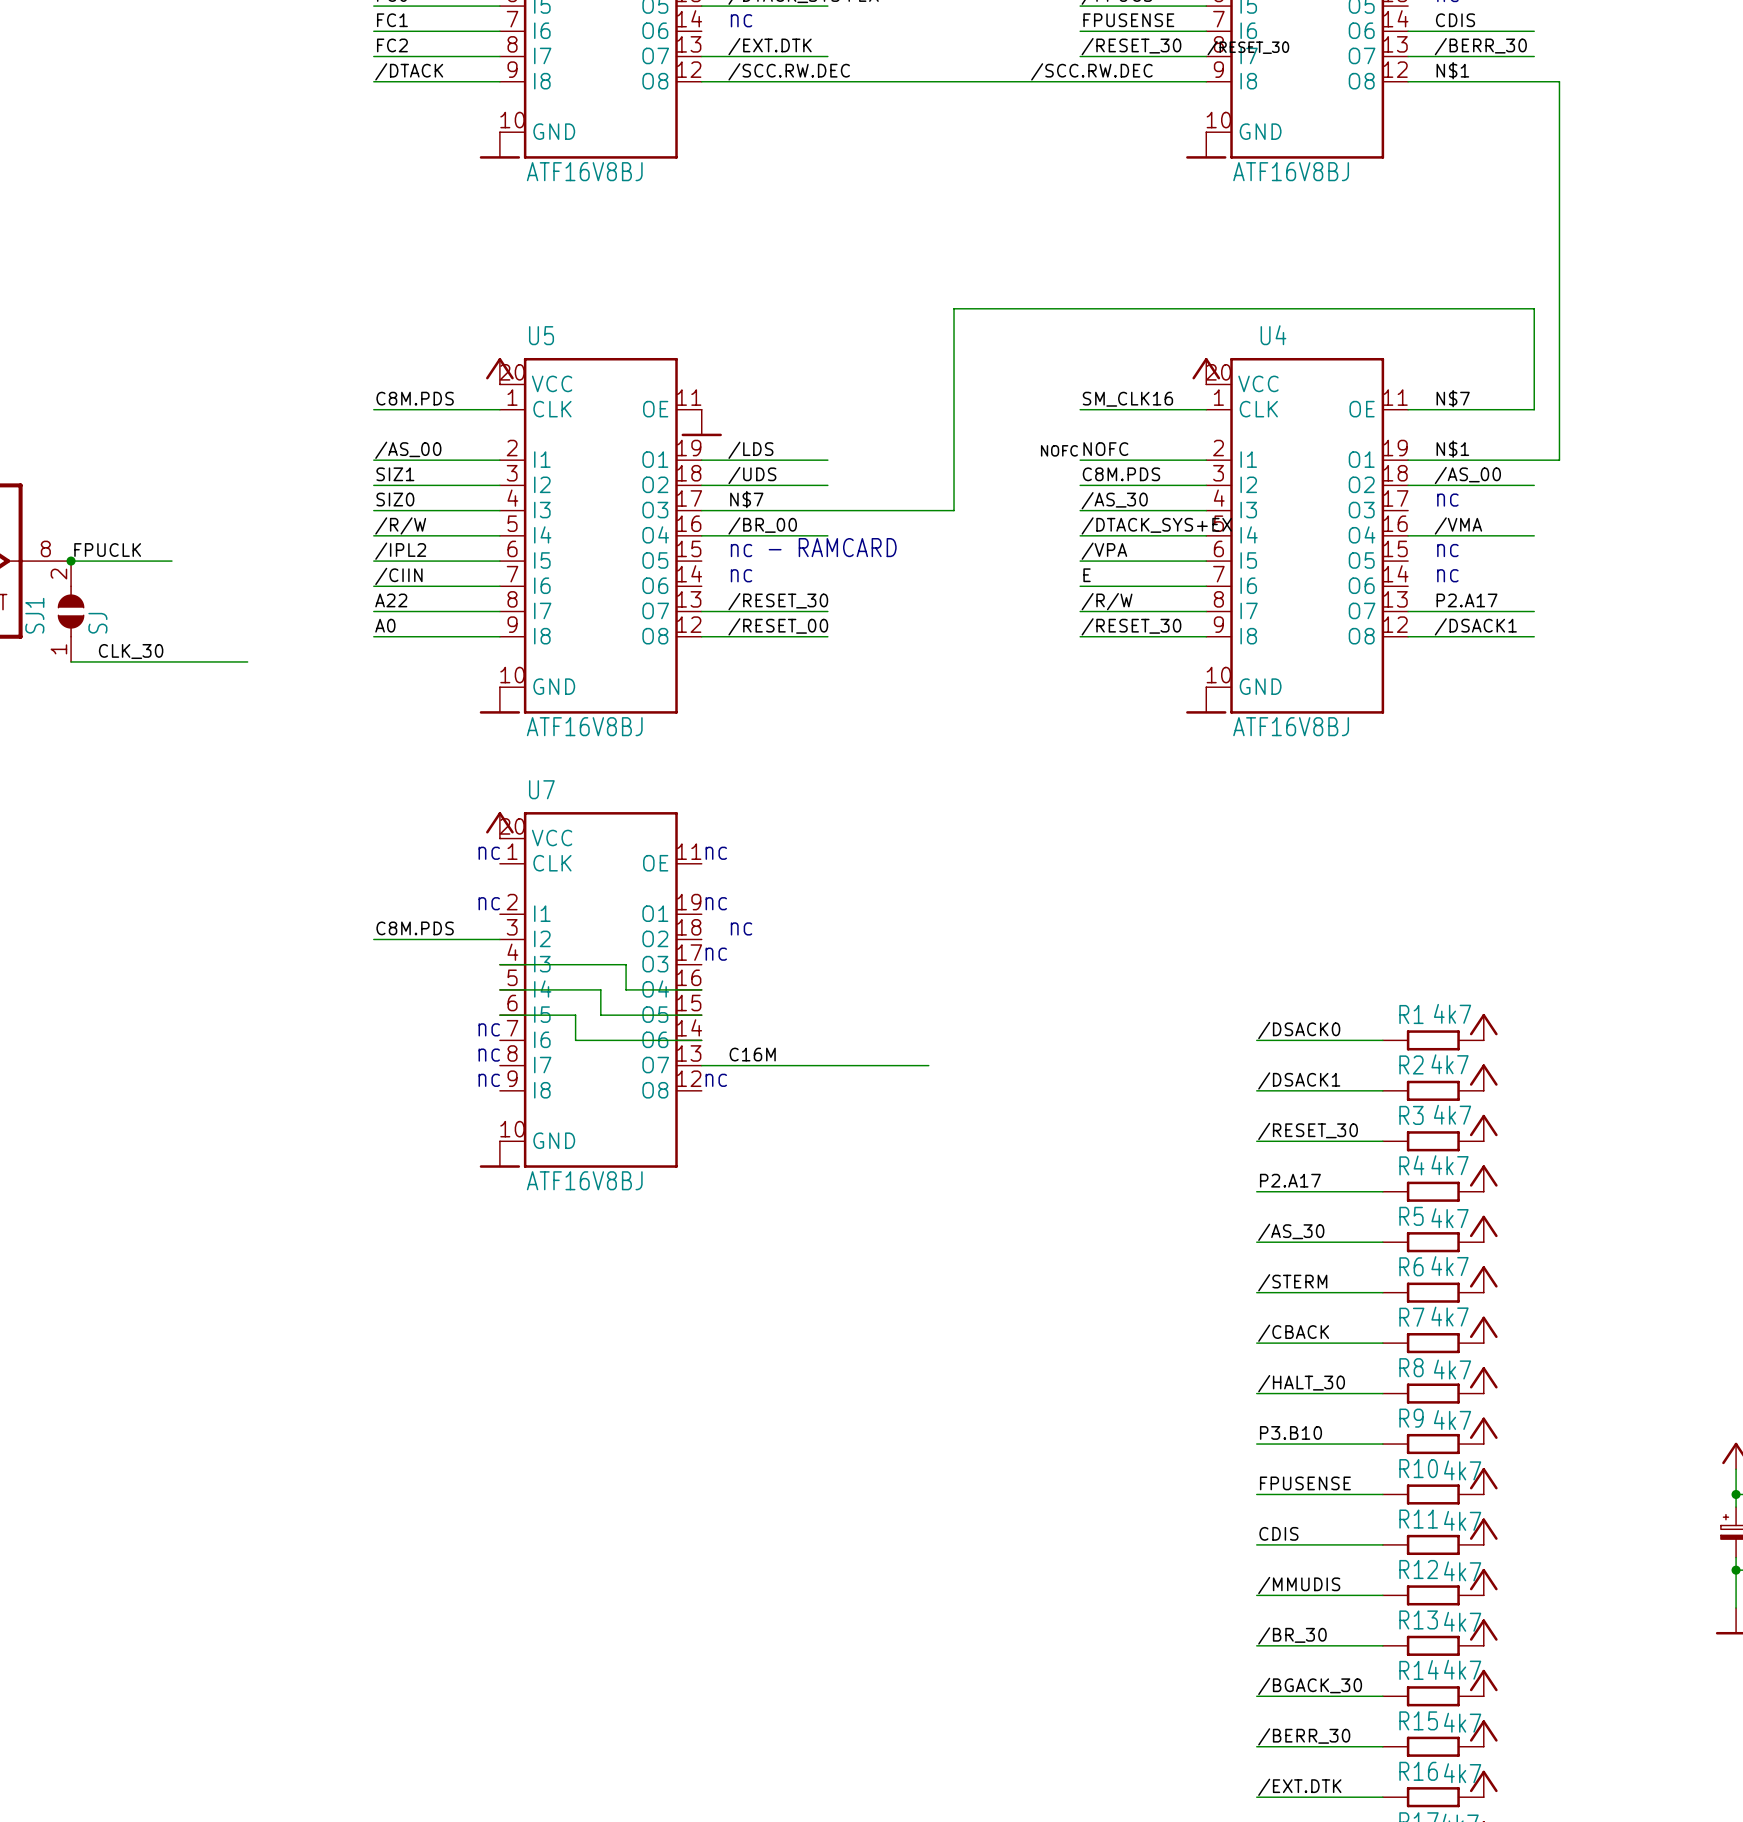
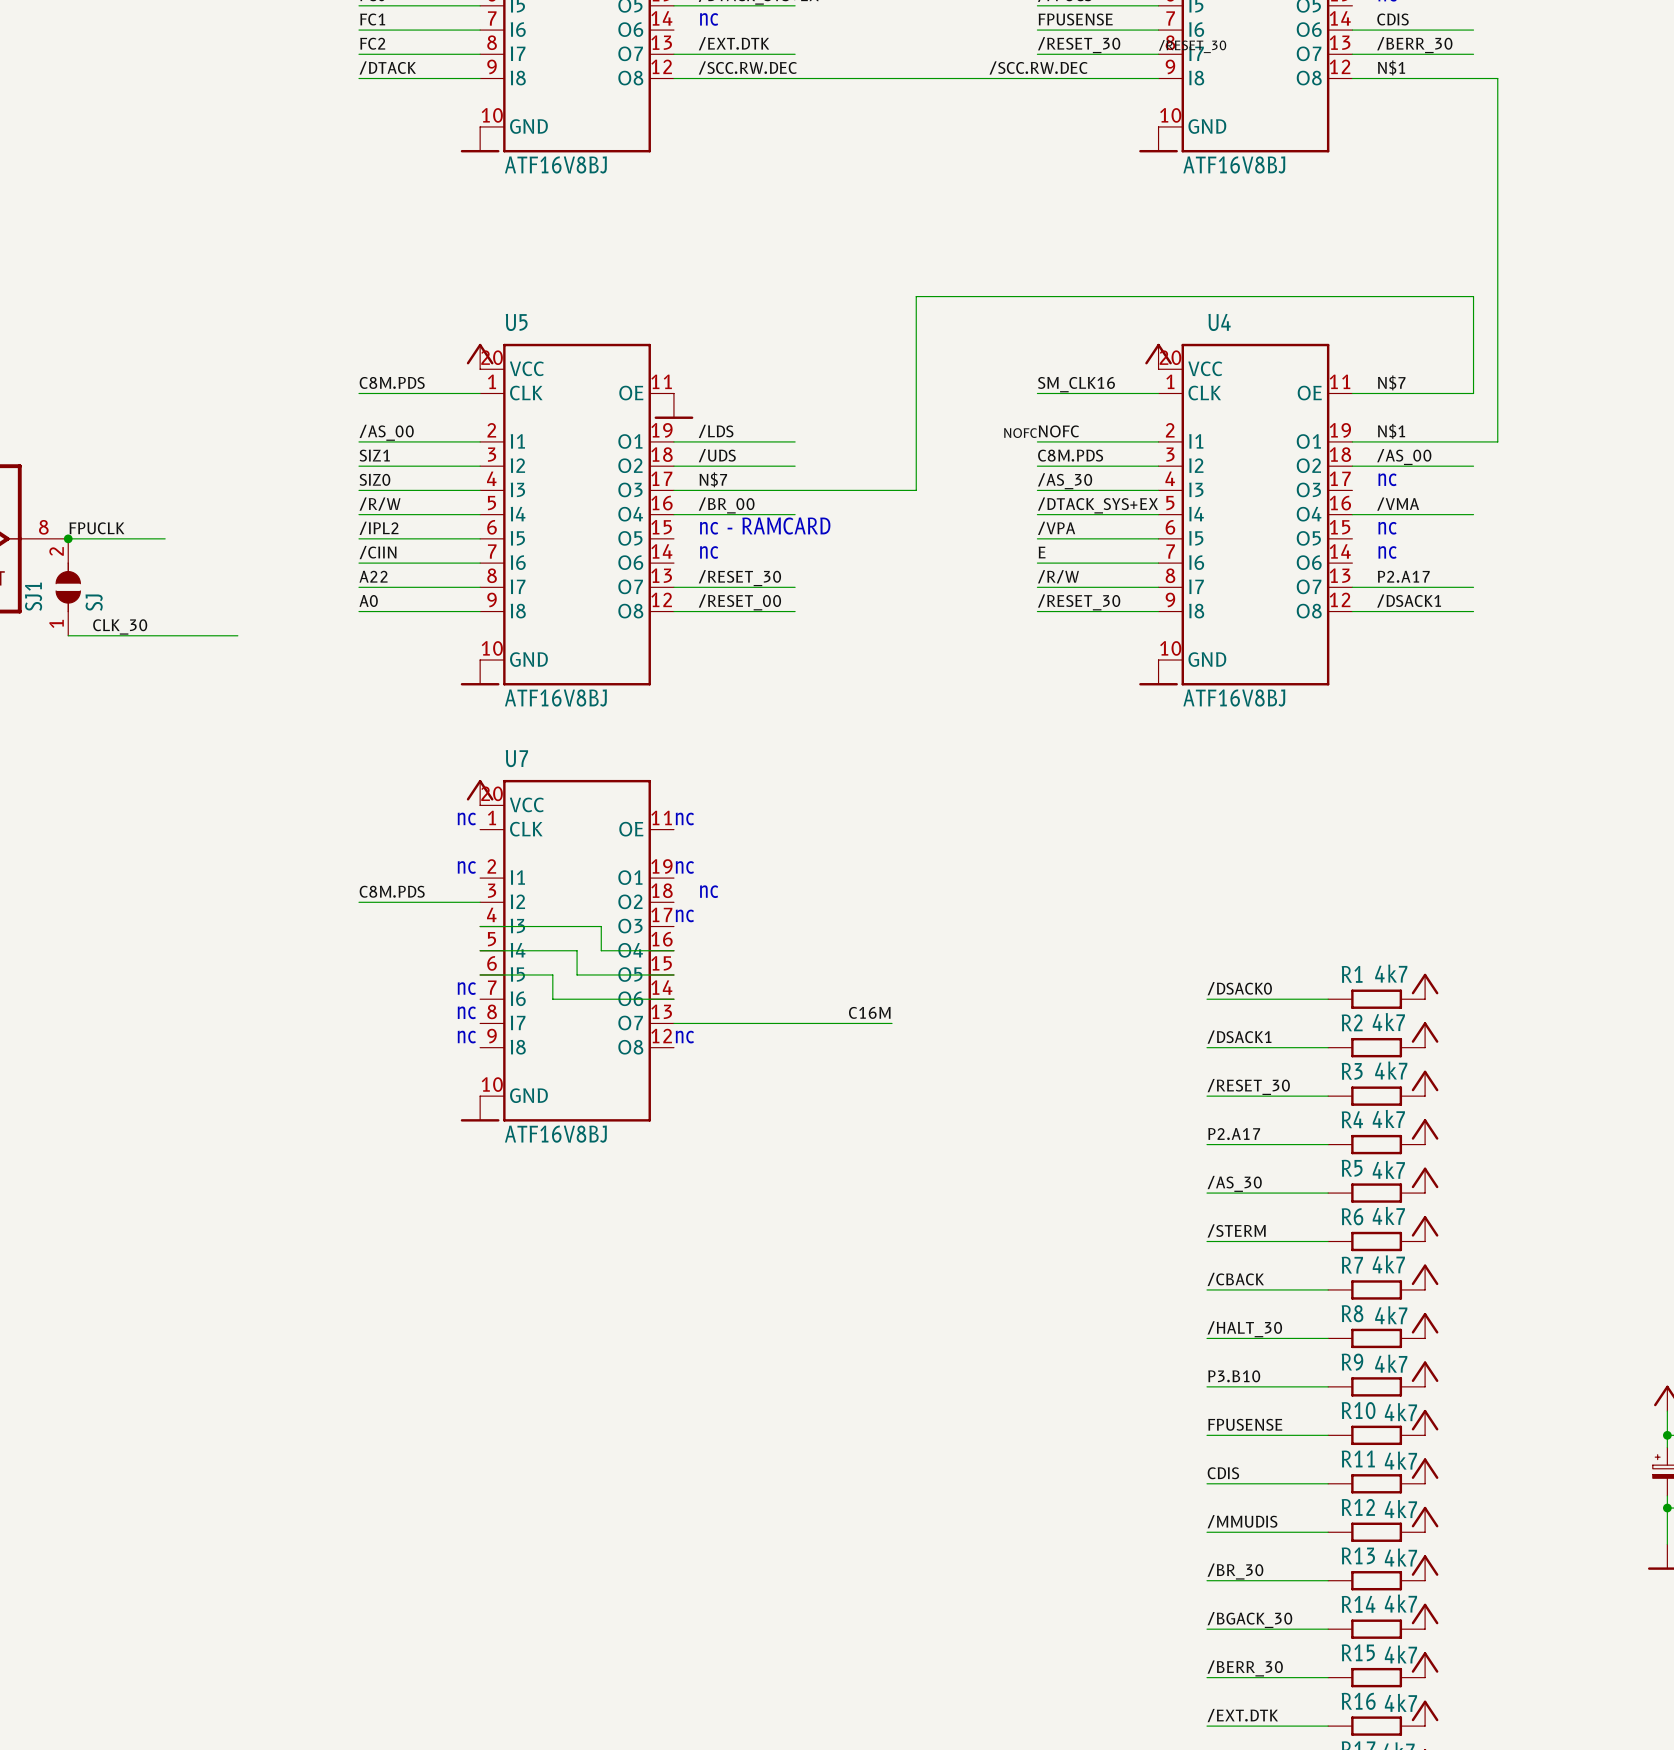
label position: C16M (752, 1054) -> C16M (869, 1012)

